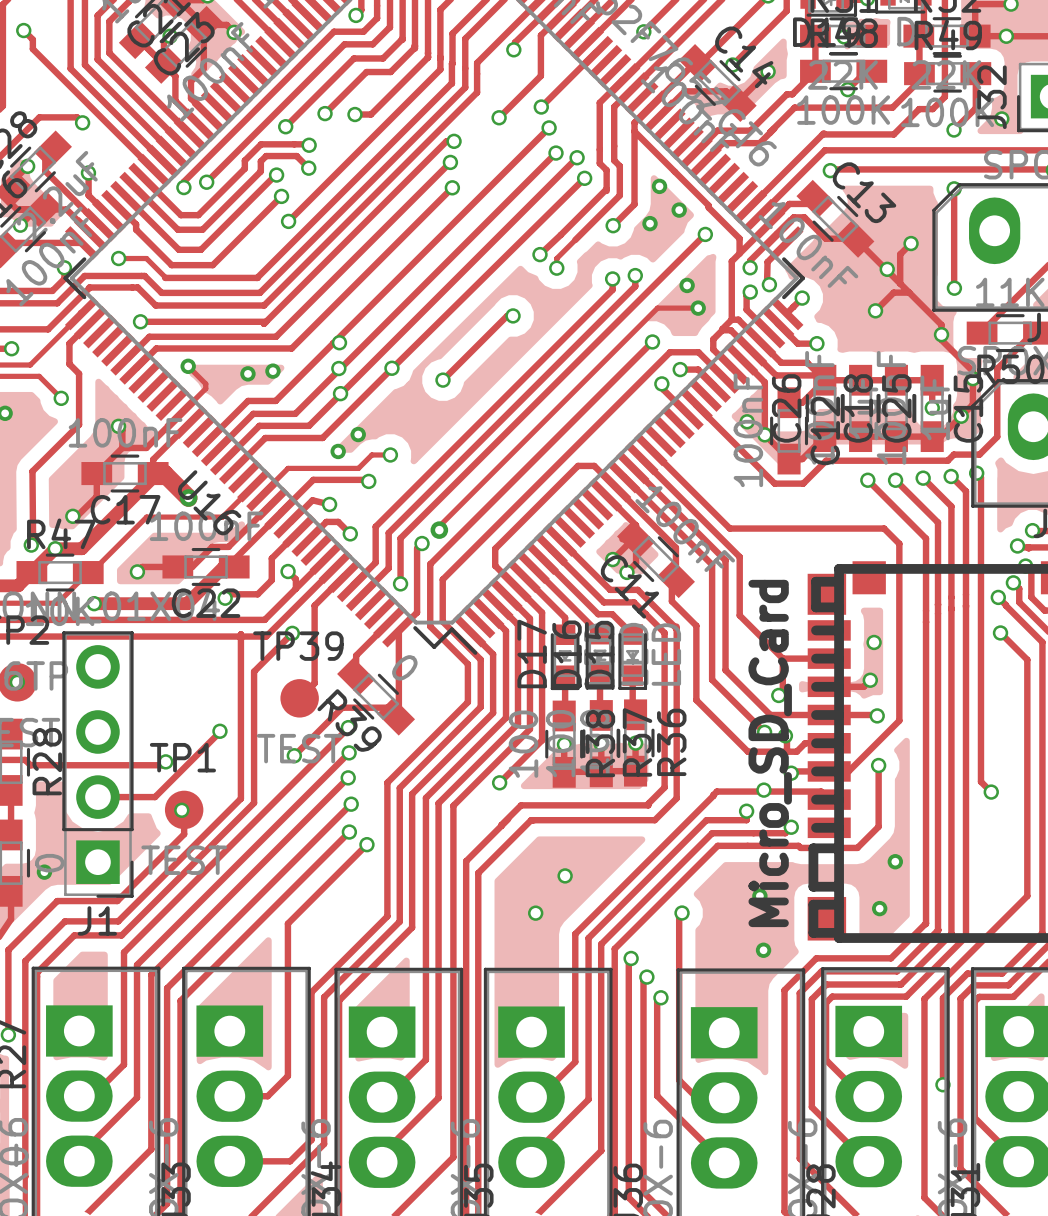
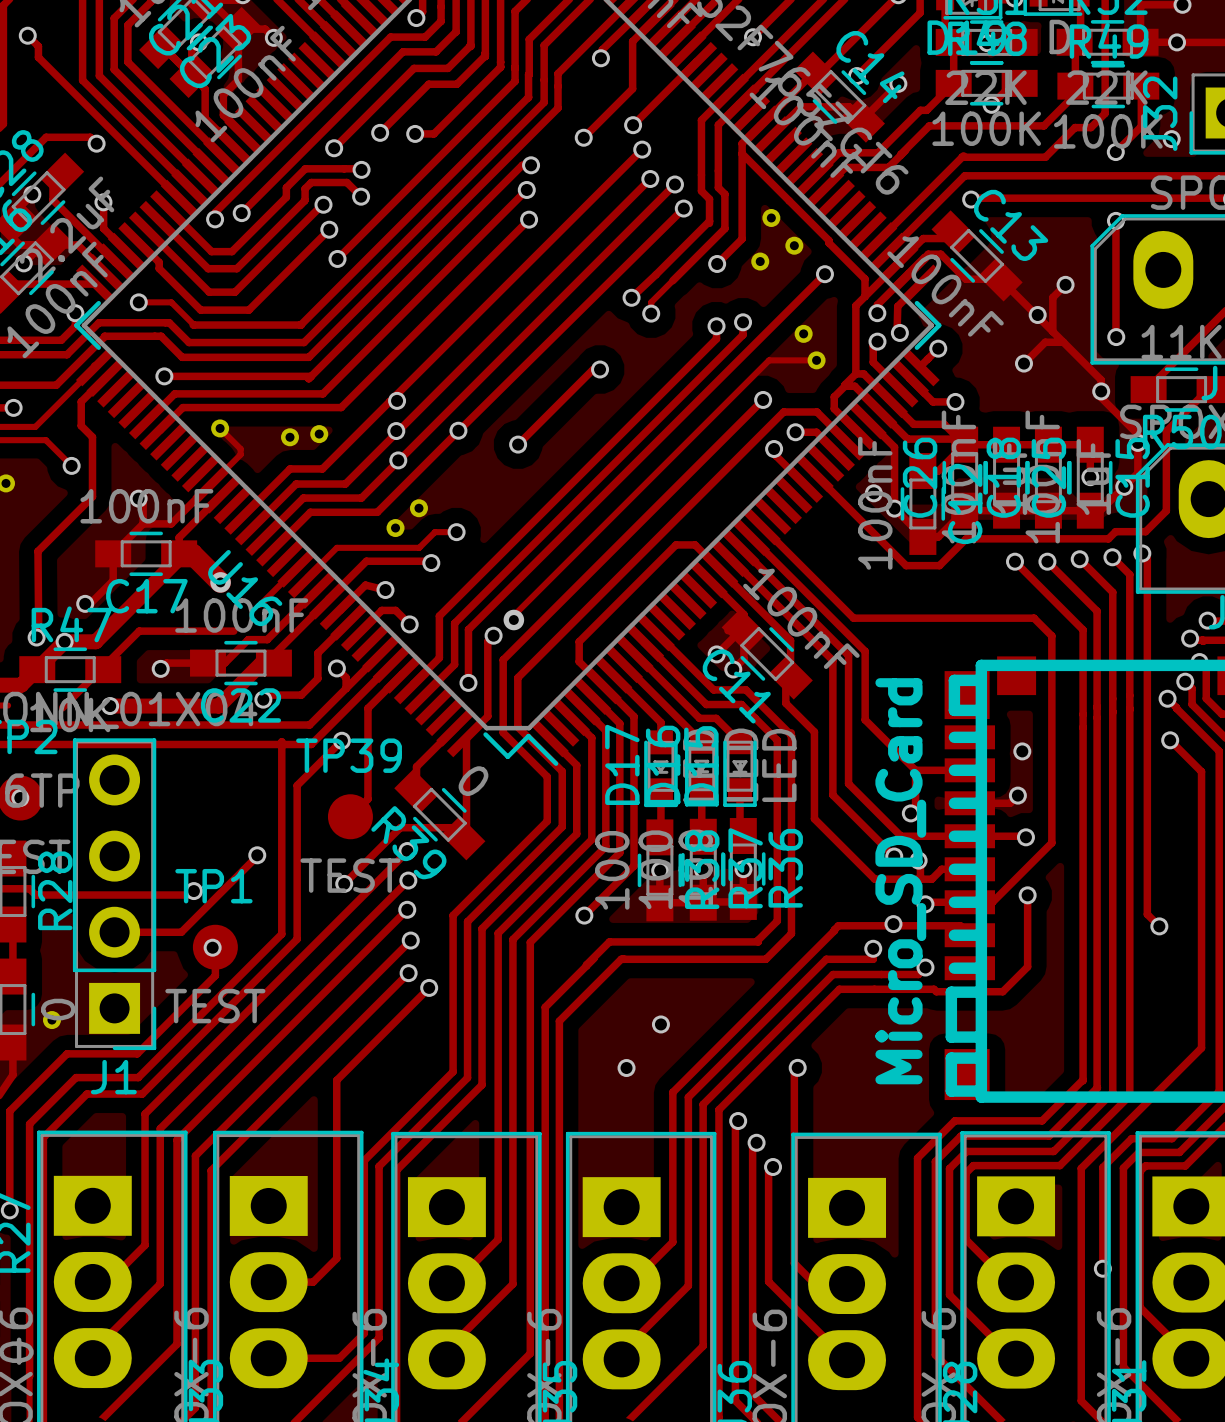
track: (222, 517) (146, 517) (57, 603) (6, 603) -> none
track: none -> (233, 631) (139, 631) (62, 707)
part: (895, 861) -> none
part: (759, 896) -> none
part: (879, 908) -> none
part: (763, 950) -> none

